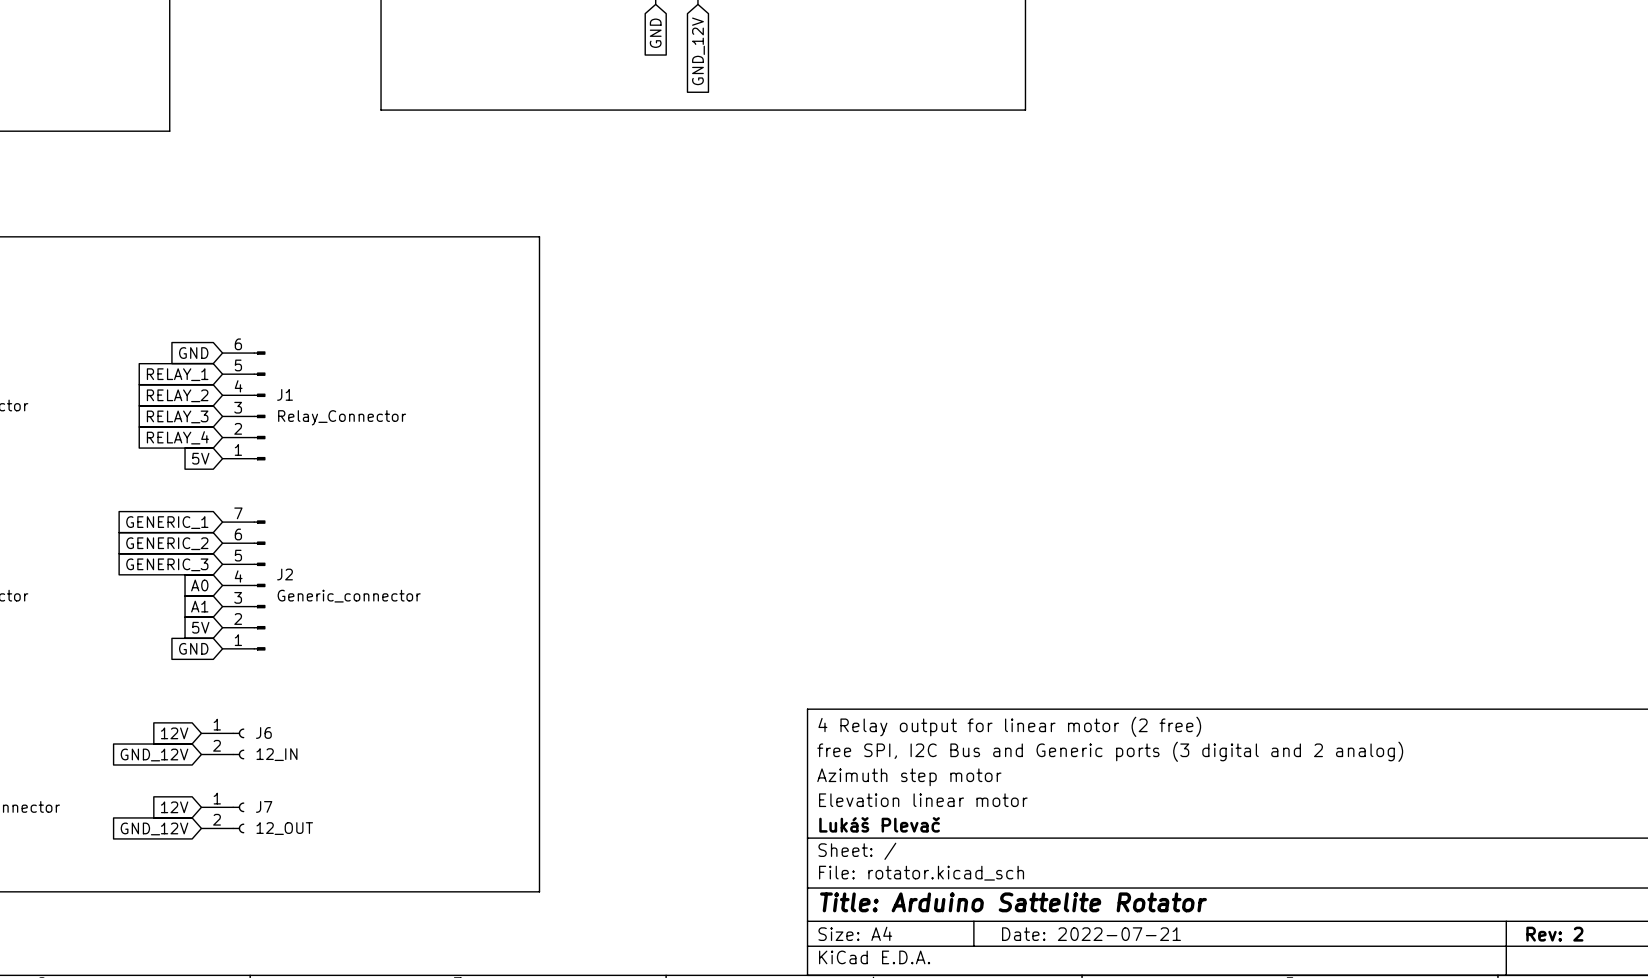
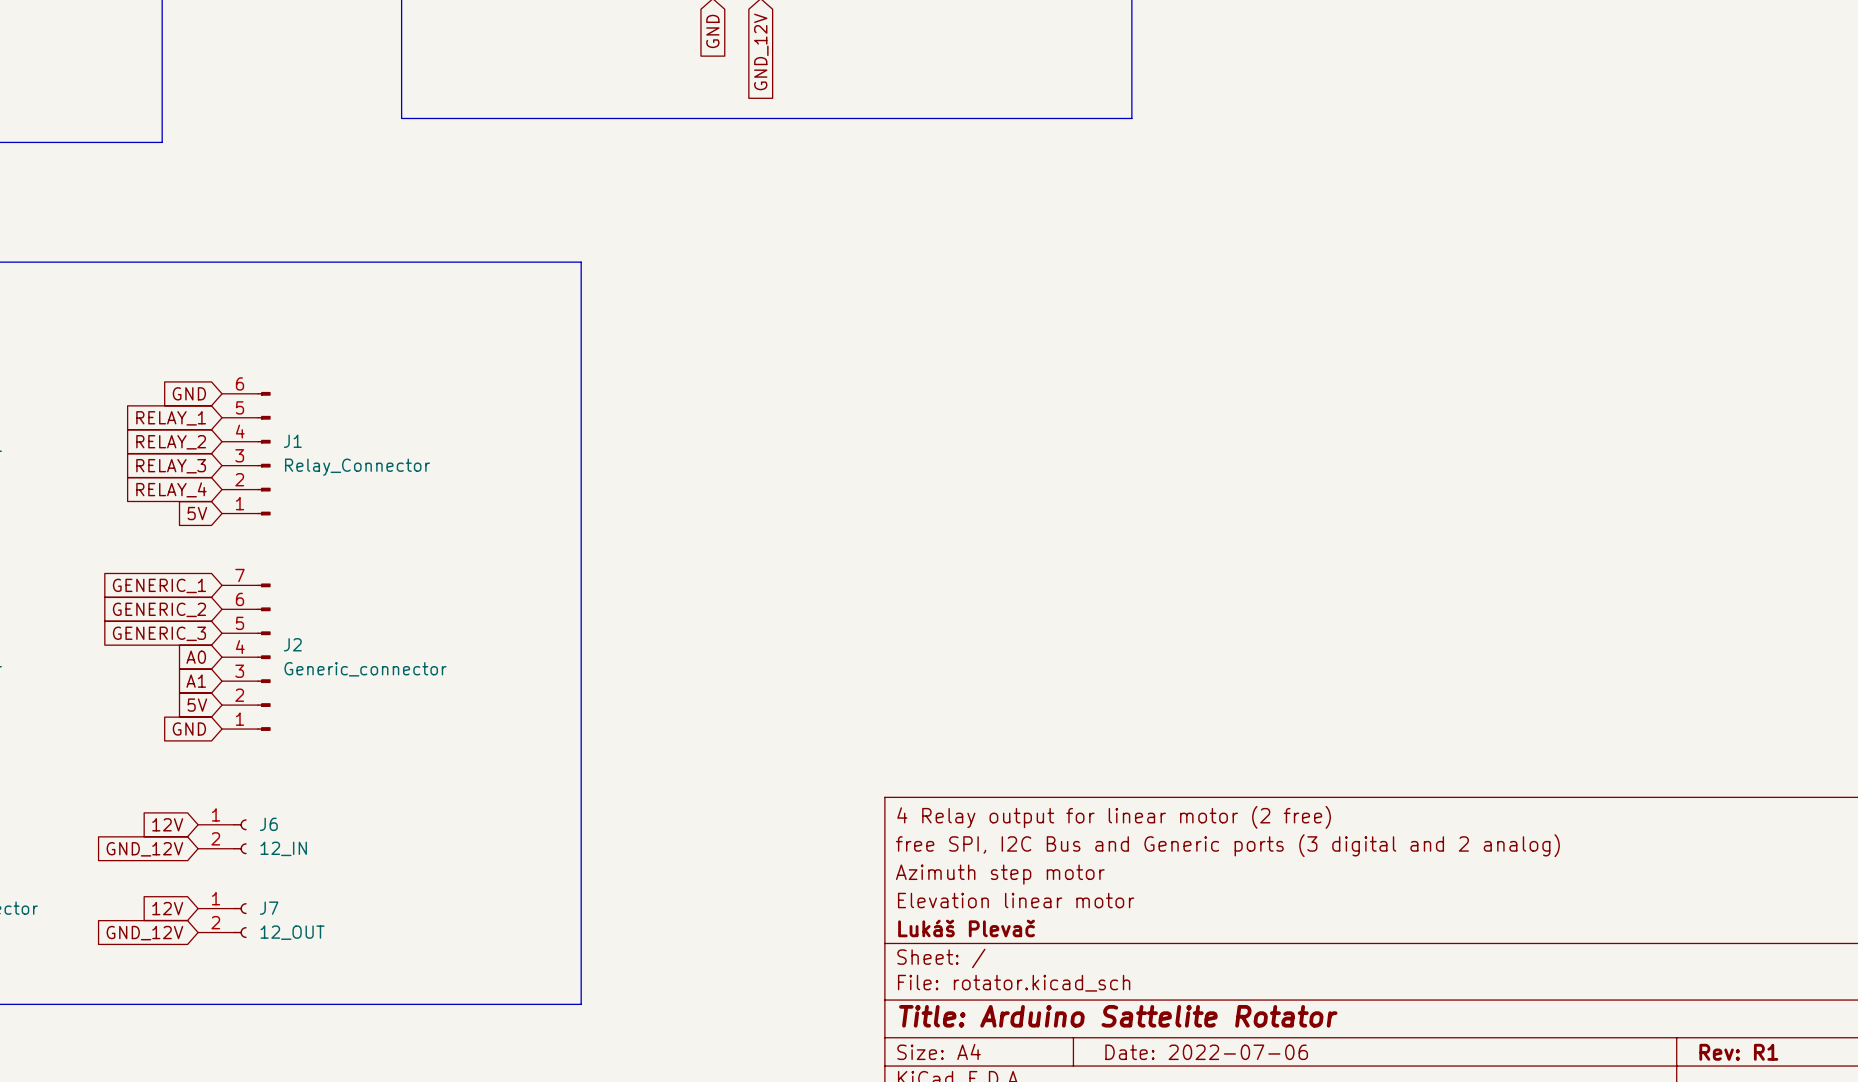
title block: Date: 2022-07-21 (1091, 934) -> Date: 2022-07-06 (1206, 1052)
title block: Rev: 2 (1554, 934) -> Rev: R1 (1738, 1052)

